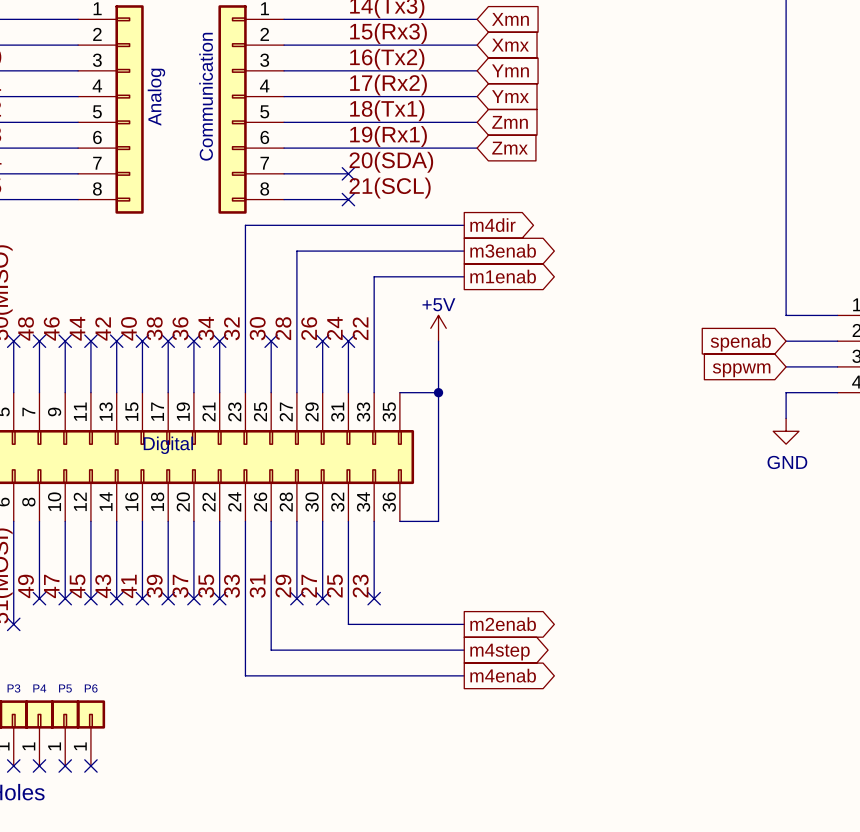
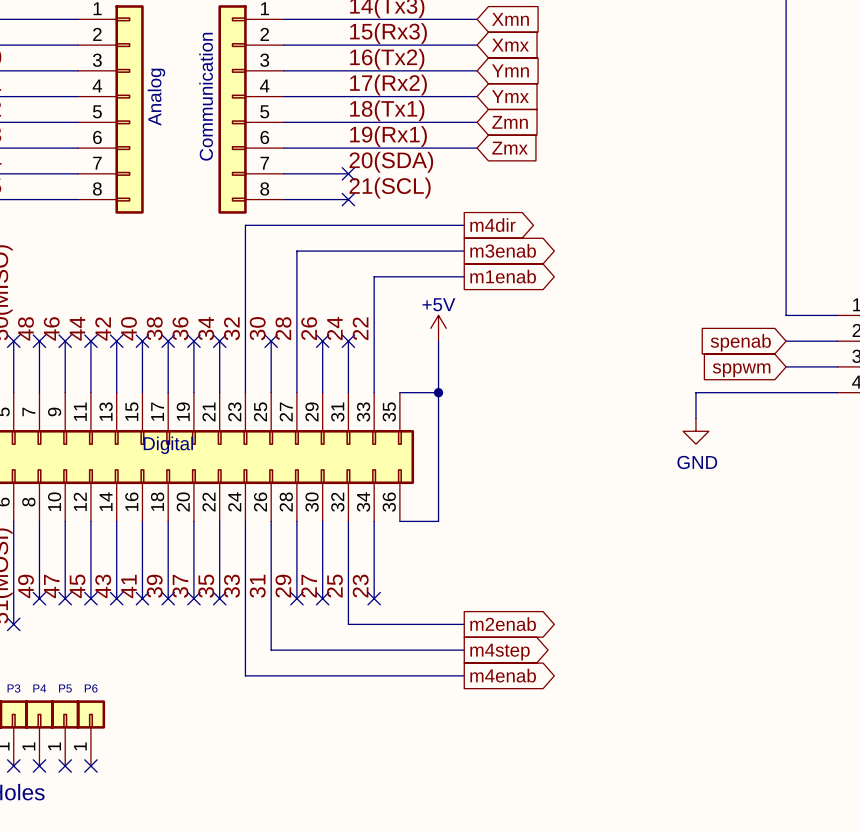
wire: (786, 392) (786, 418) -> (786, 392) (695, 392) (695, 418)
power symbol position: GND (786, 431) -> GND (695, 431)

